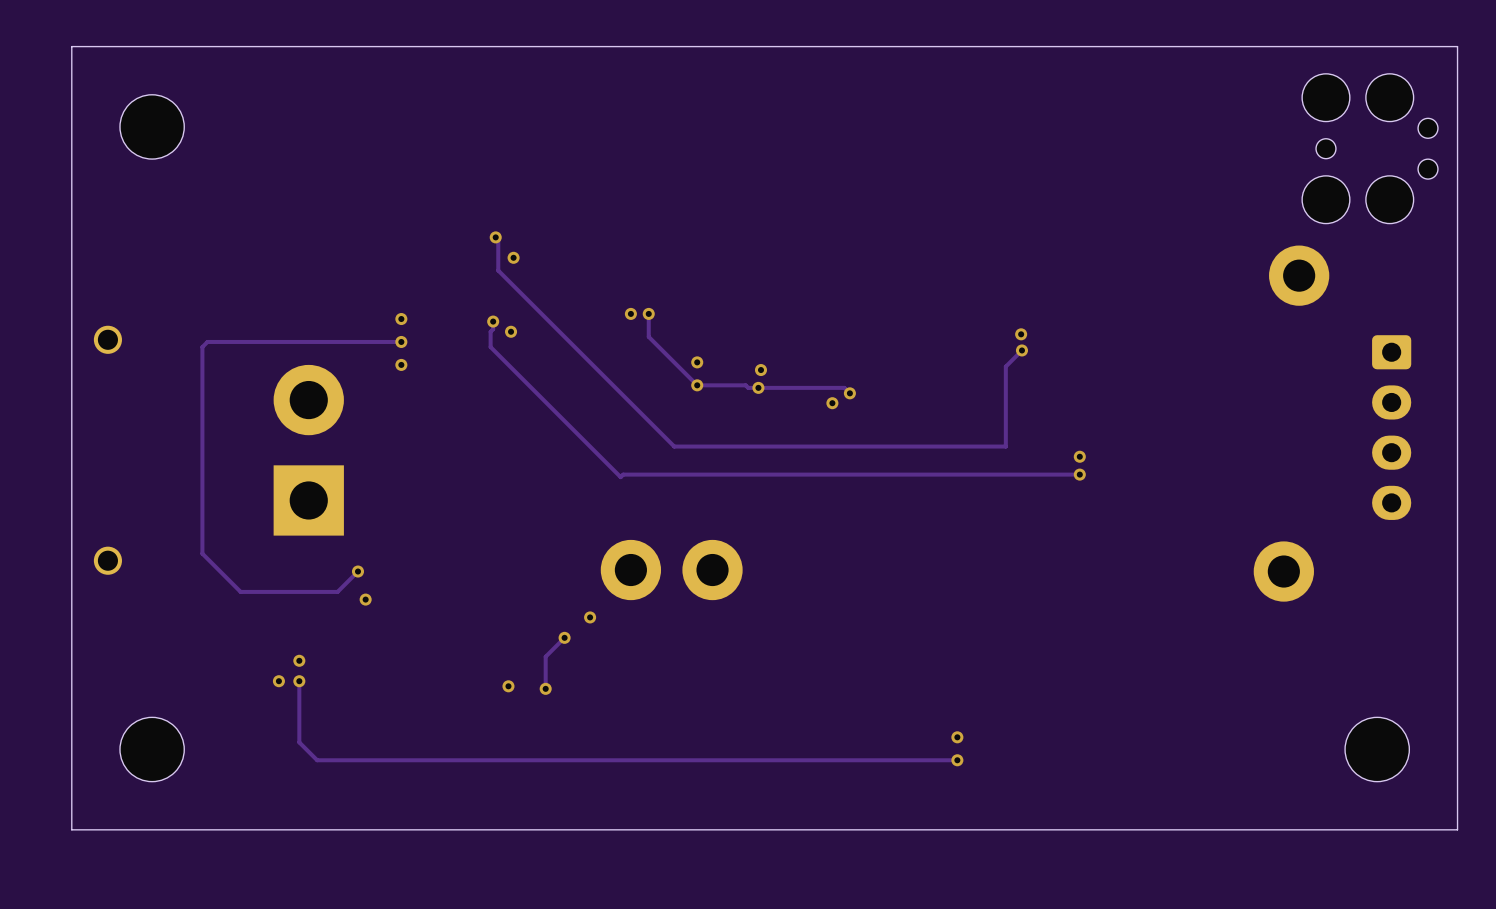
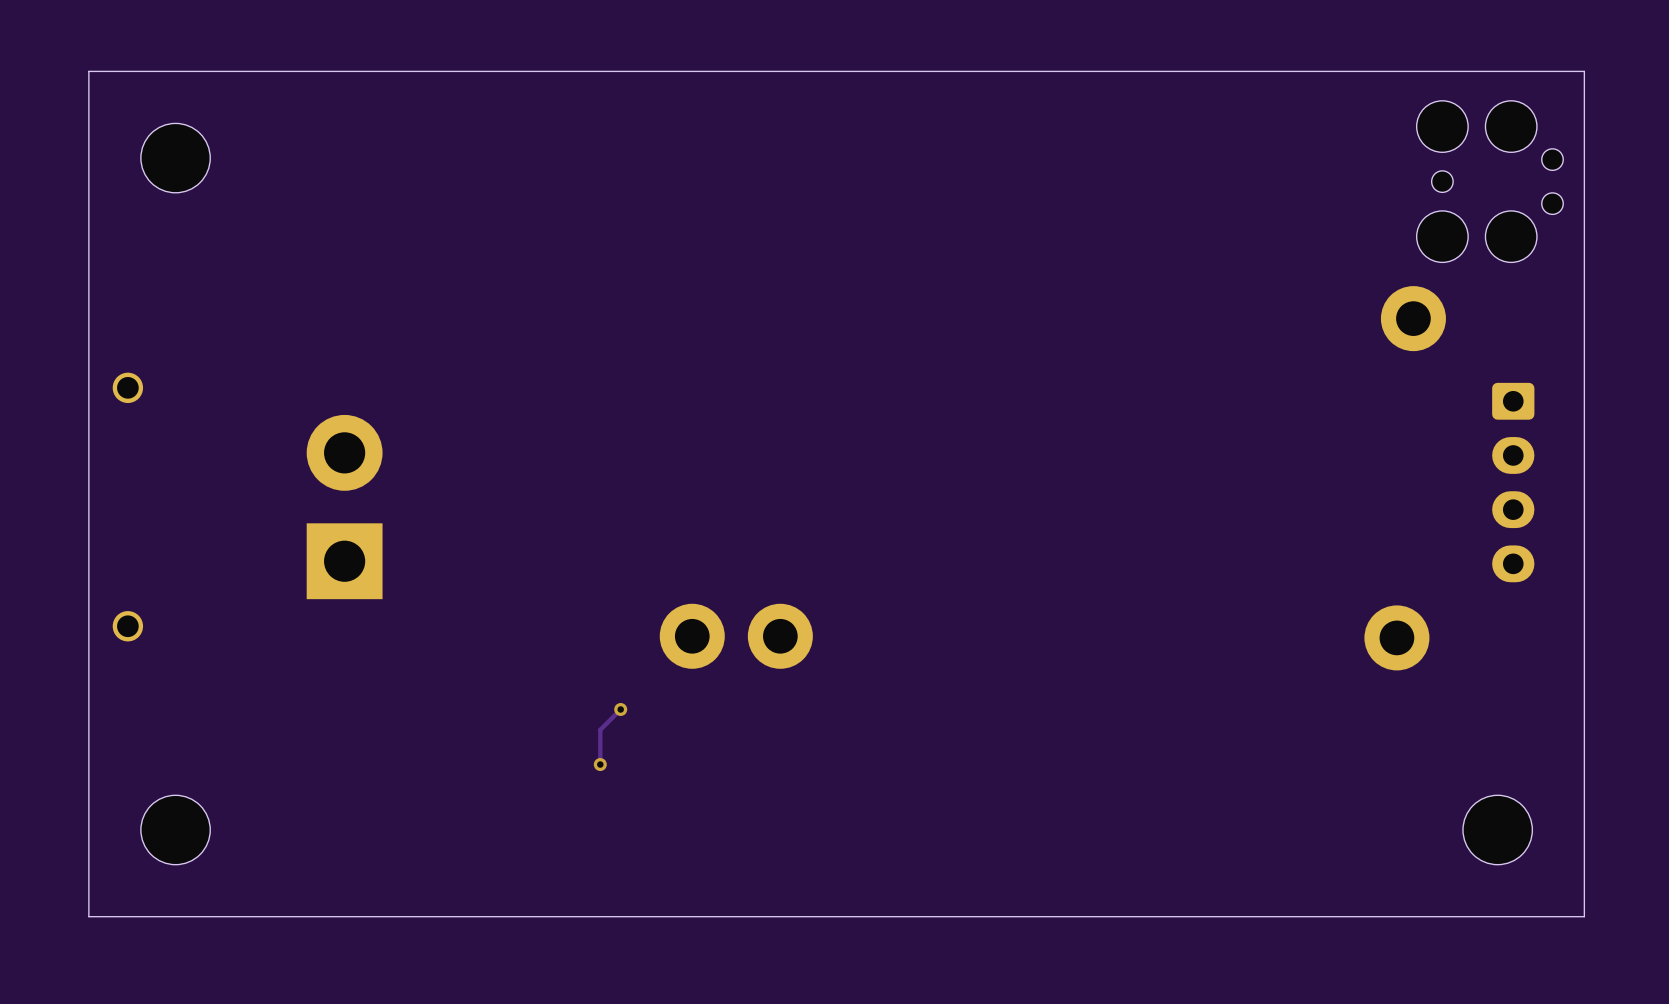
track: (495, 237) (498, 239) (498, 270) (674, 446) (1005, 446) (1005, 366) (1021, 350) -> none
via: (495, 237) -> none
via: (513, 257) -> none
via: (630, 313) -> none
track: (648, 313) (648, 336) (697, 385) (745, 385) (748, 387) (844, 387) (849, 393) -> none
via: (648, 313) -> none
via: (401, 319) -> none
track: (493, 321) (493, 329) (490, 331) (490, 347) (620, 477) (623, 474) (1079, 474) -> none
via: (493, 321) -> none
via: (511, 331) -> none
via: (1021, 334) -> none
track: (401, 341) (207, 341) (202, 347) (202, 553) (240, 591) (337, 591) (357, 571) -> none
via: (401, 341) -> none
via: (1021, 350) -> none
via: (697, 362) -> none
via: (401, 364) -> none
via: (760, 370) -> none
via: (697, 385) -> none
via: (758, 387) -> none
via: (849, 393) -> none
via: (832, 403) -> none
via: (1079, 456) -> none
via: (1079, 474) -> none
via: (357, 571) -> none
via: (365, 599) -> none
via: (590, 617) -> none
via: (299, 660) -> none
via: (278, 681) -> none
track: (299, 681) (299, 742) (317, 760) (957, 760) -> none
via: (299, 681) -> none
via: (508, 686) -> none
via: (957, 737) -> none
via: (957, 760) -> none

